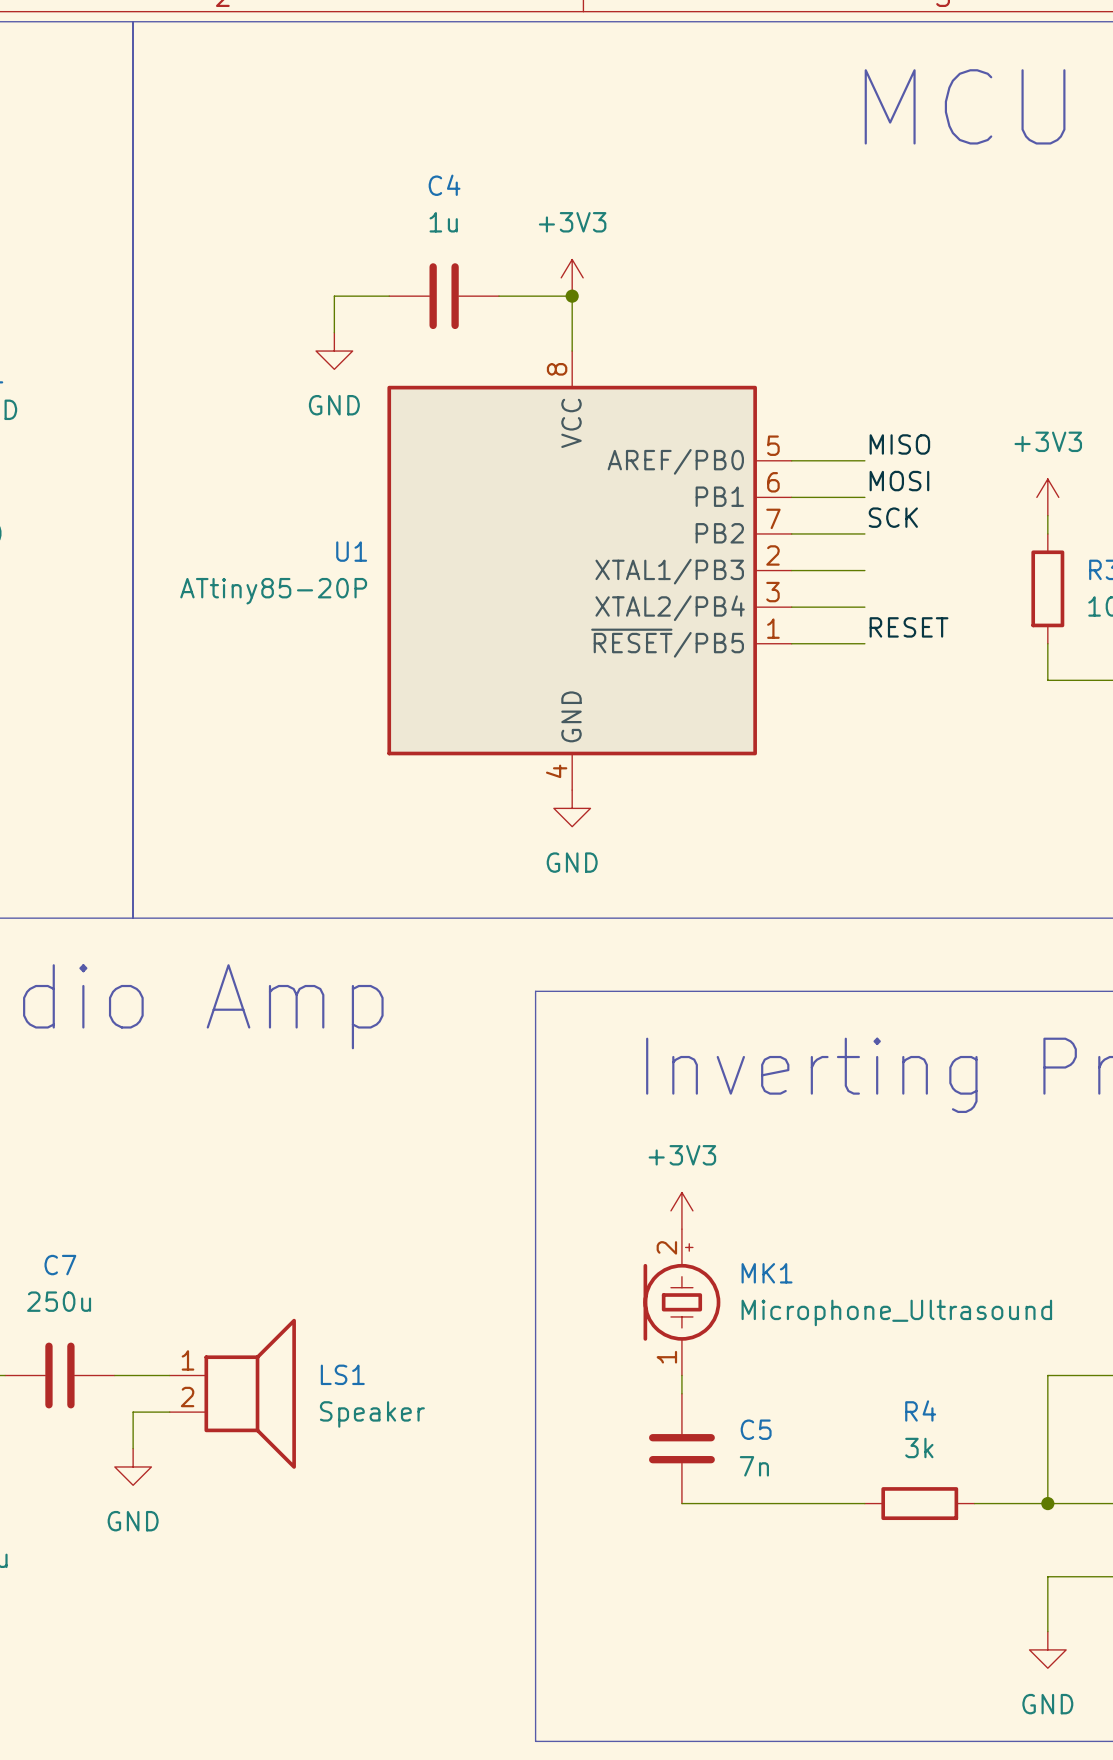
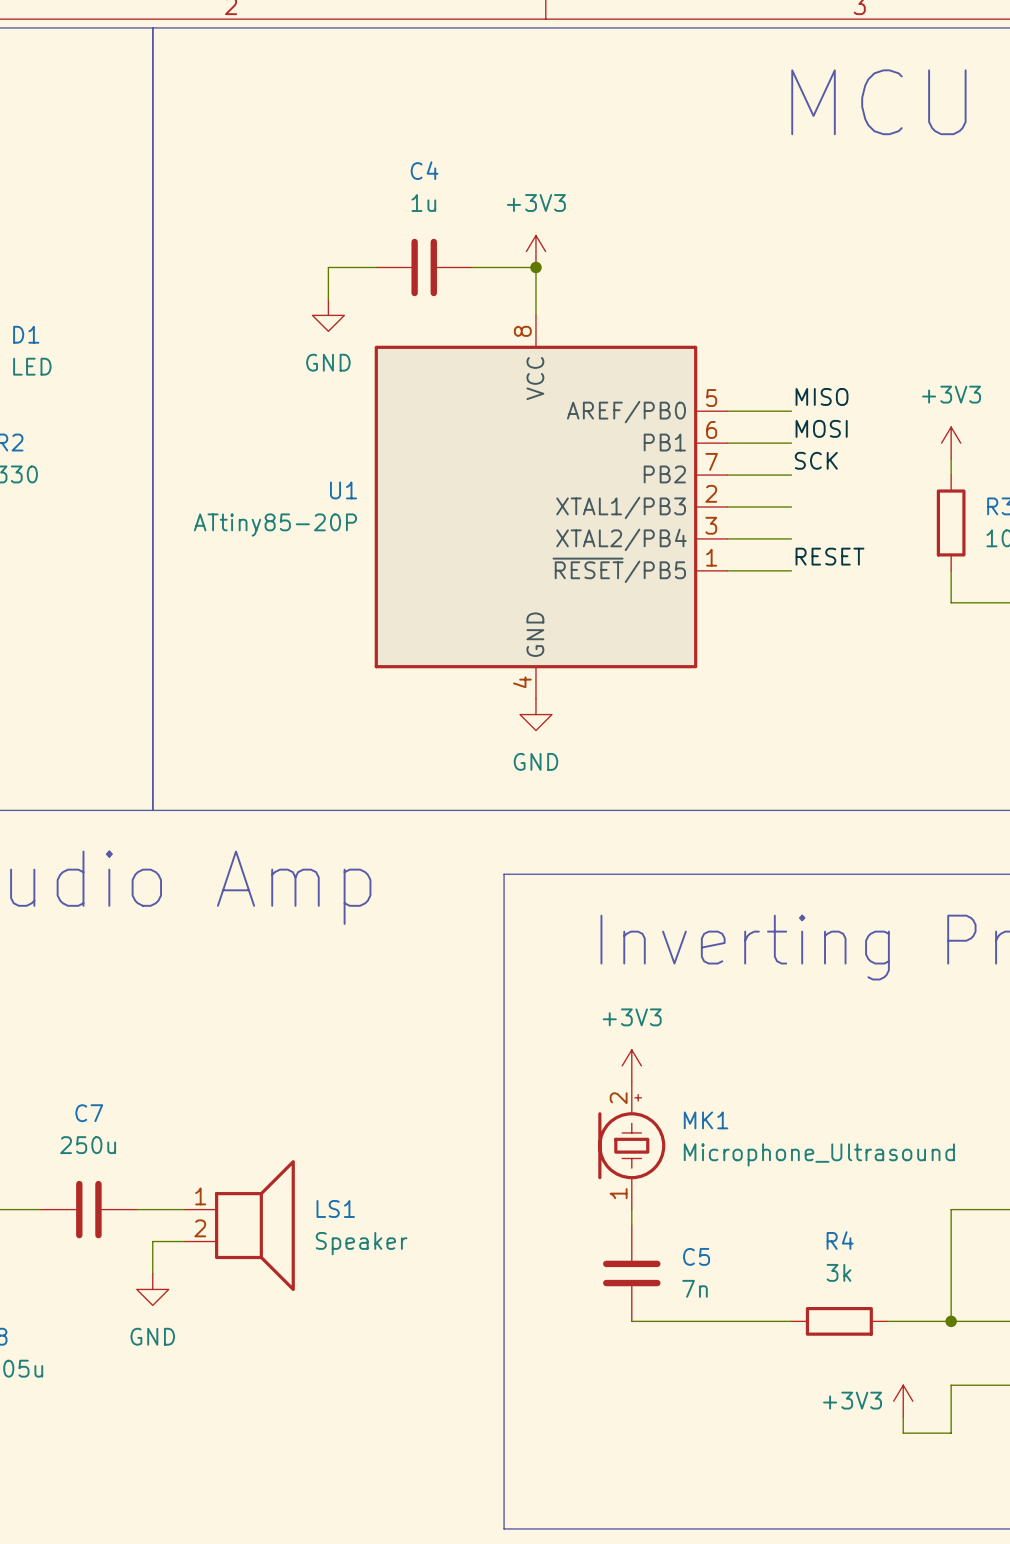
power symbol: none -> +3V3 (903, 1401)
wire: none -> (903, 1417) (903, 1433) (951, 1433)
power symbol: GND (1047, 1649) -> none

